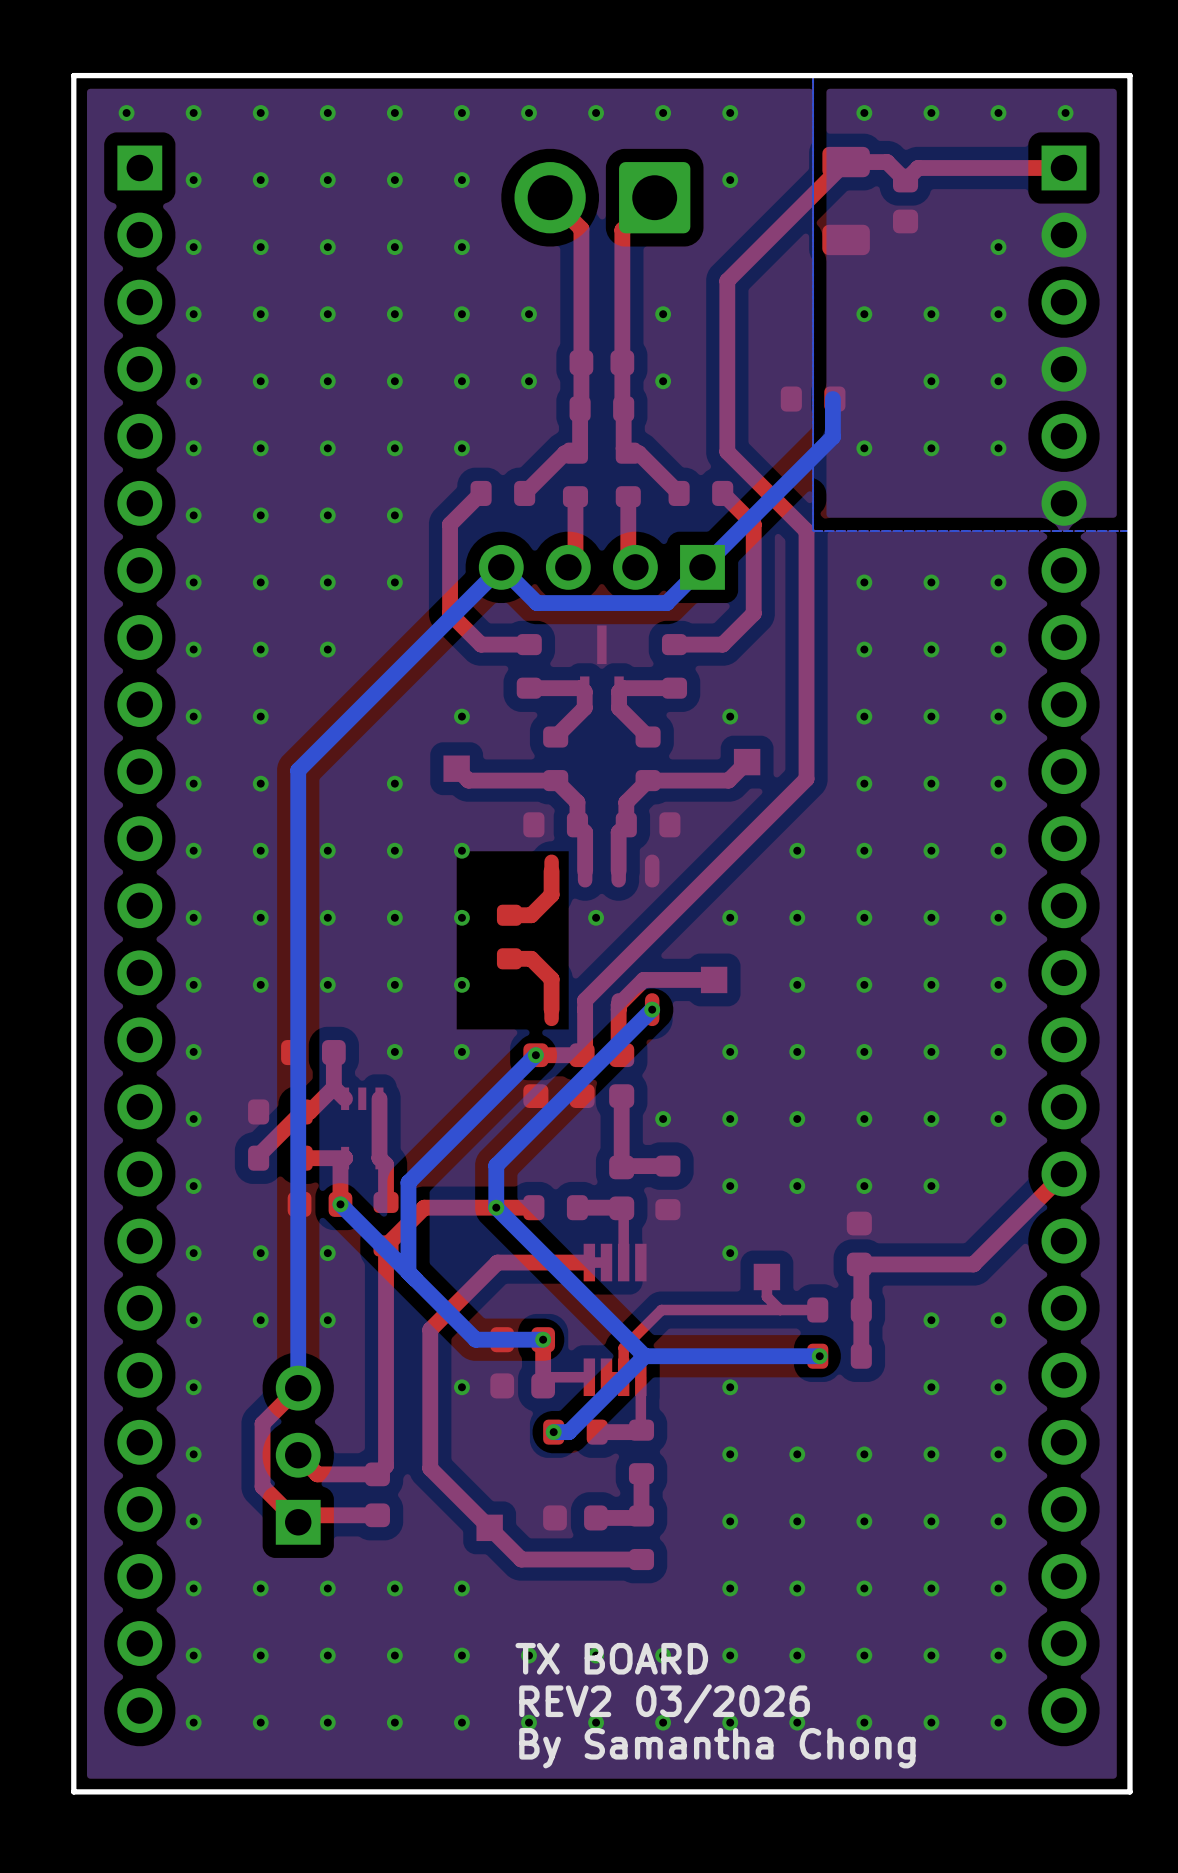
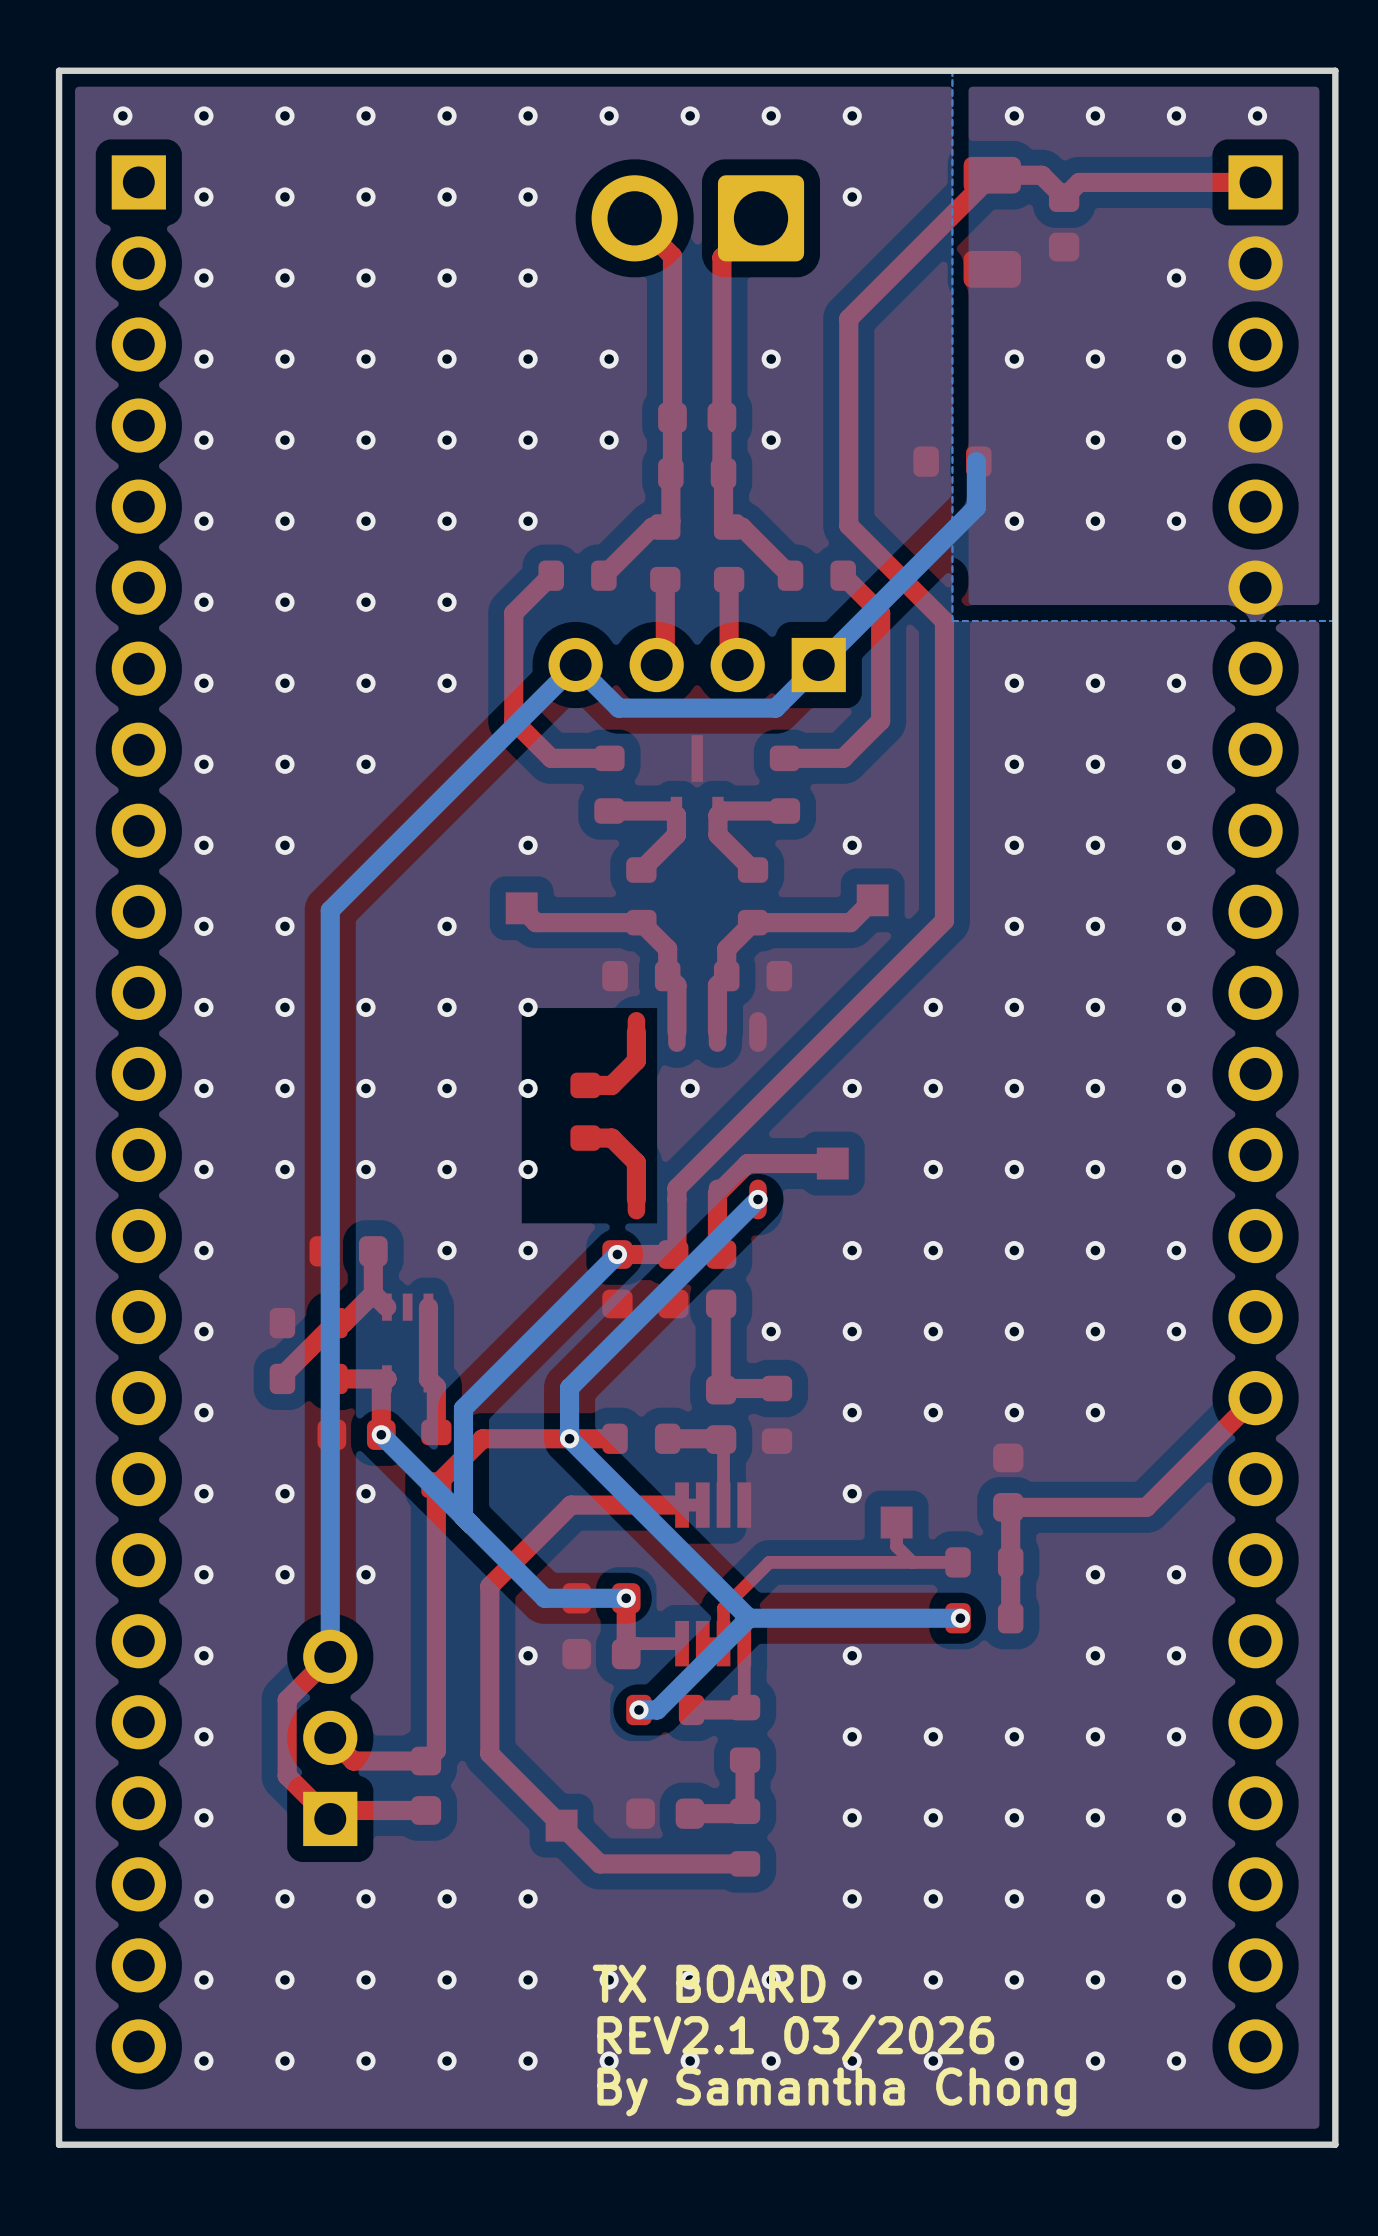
text: REV2 03/2026 (664, 1703) -> REV2.1 03/2026 (795, 2038)

